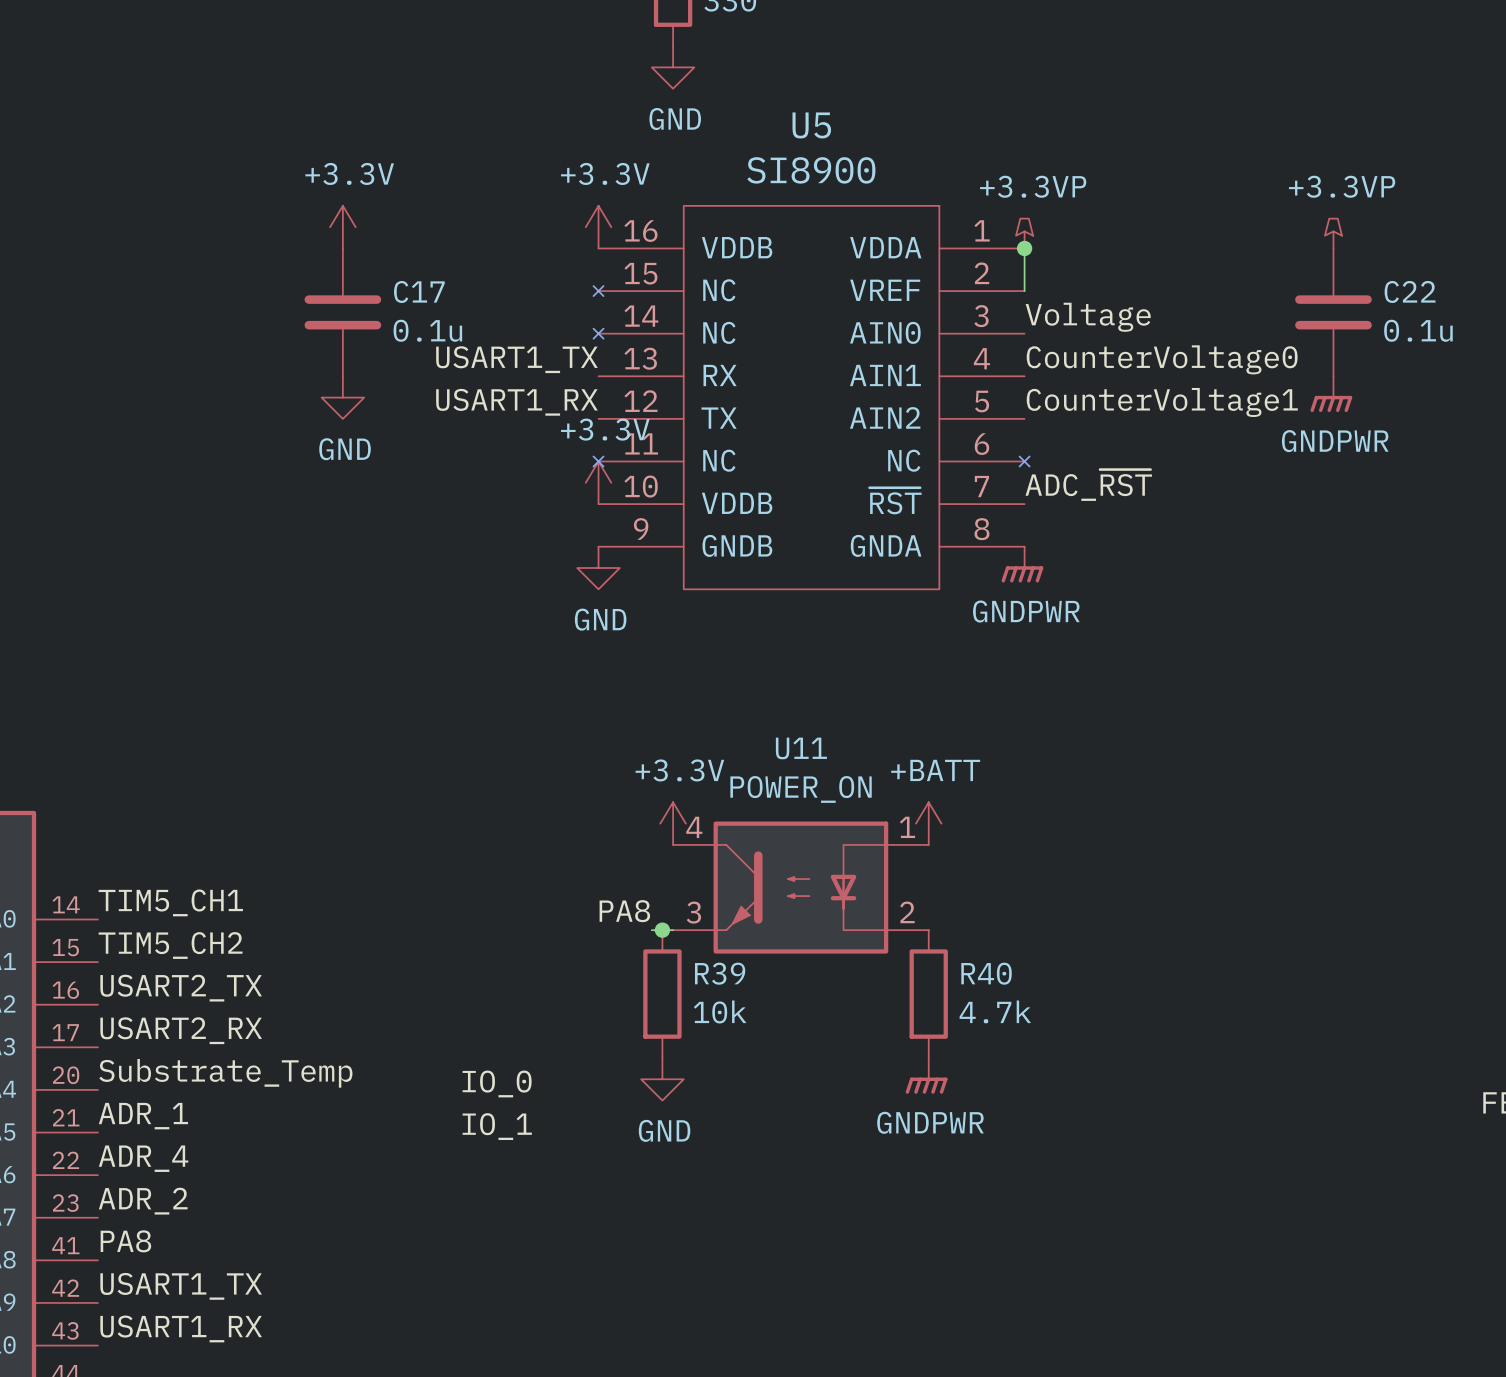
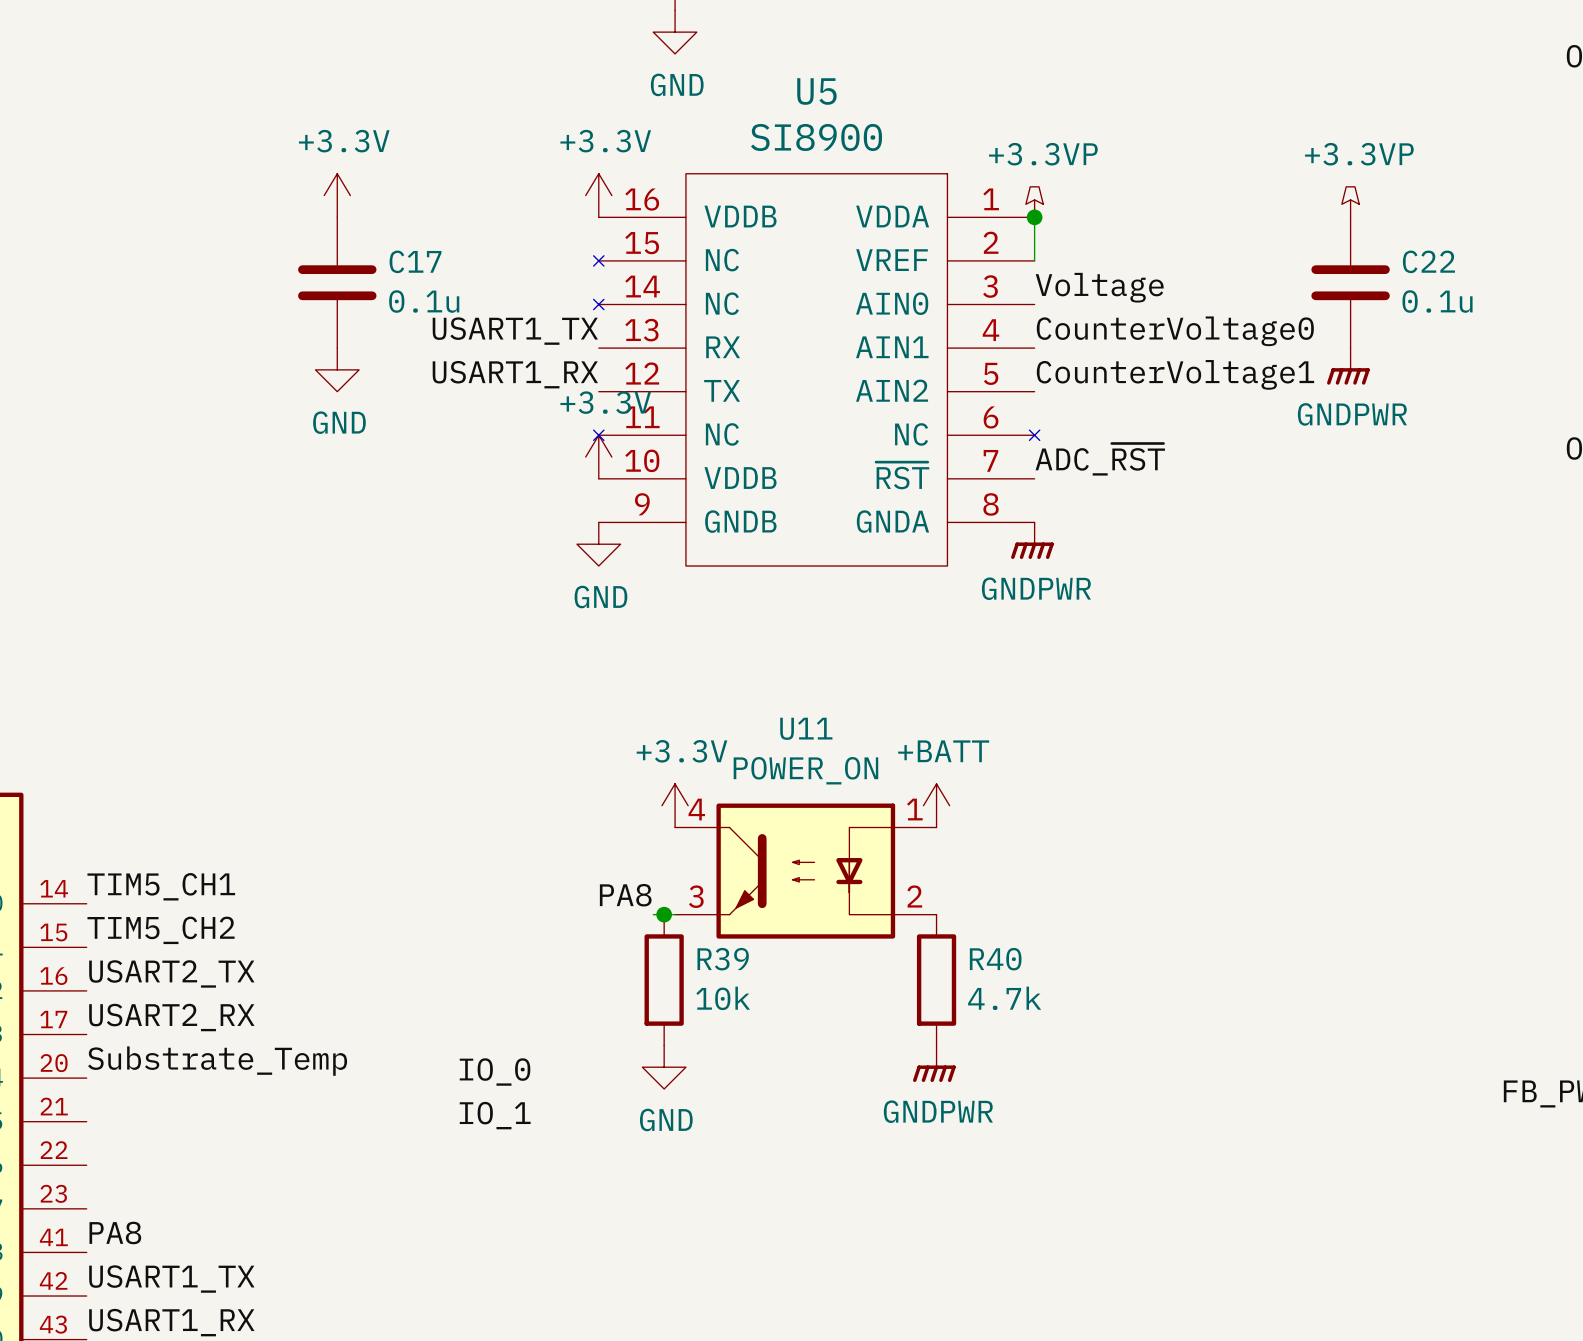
label: ADR_1 (143, 1116) -> none
label: ADR_4 (143, 1158) -> none
label: ADR_2 (143, 1201) -> none

